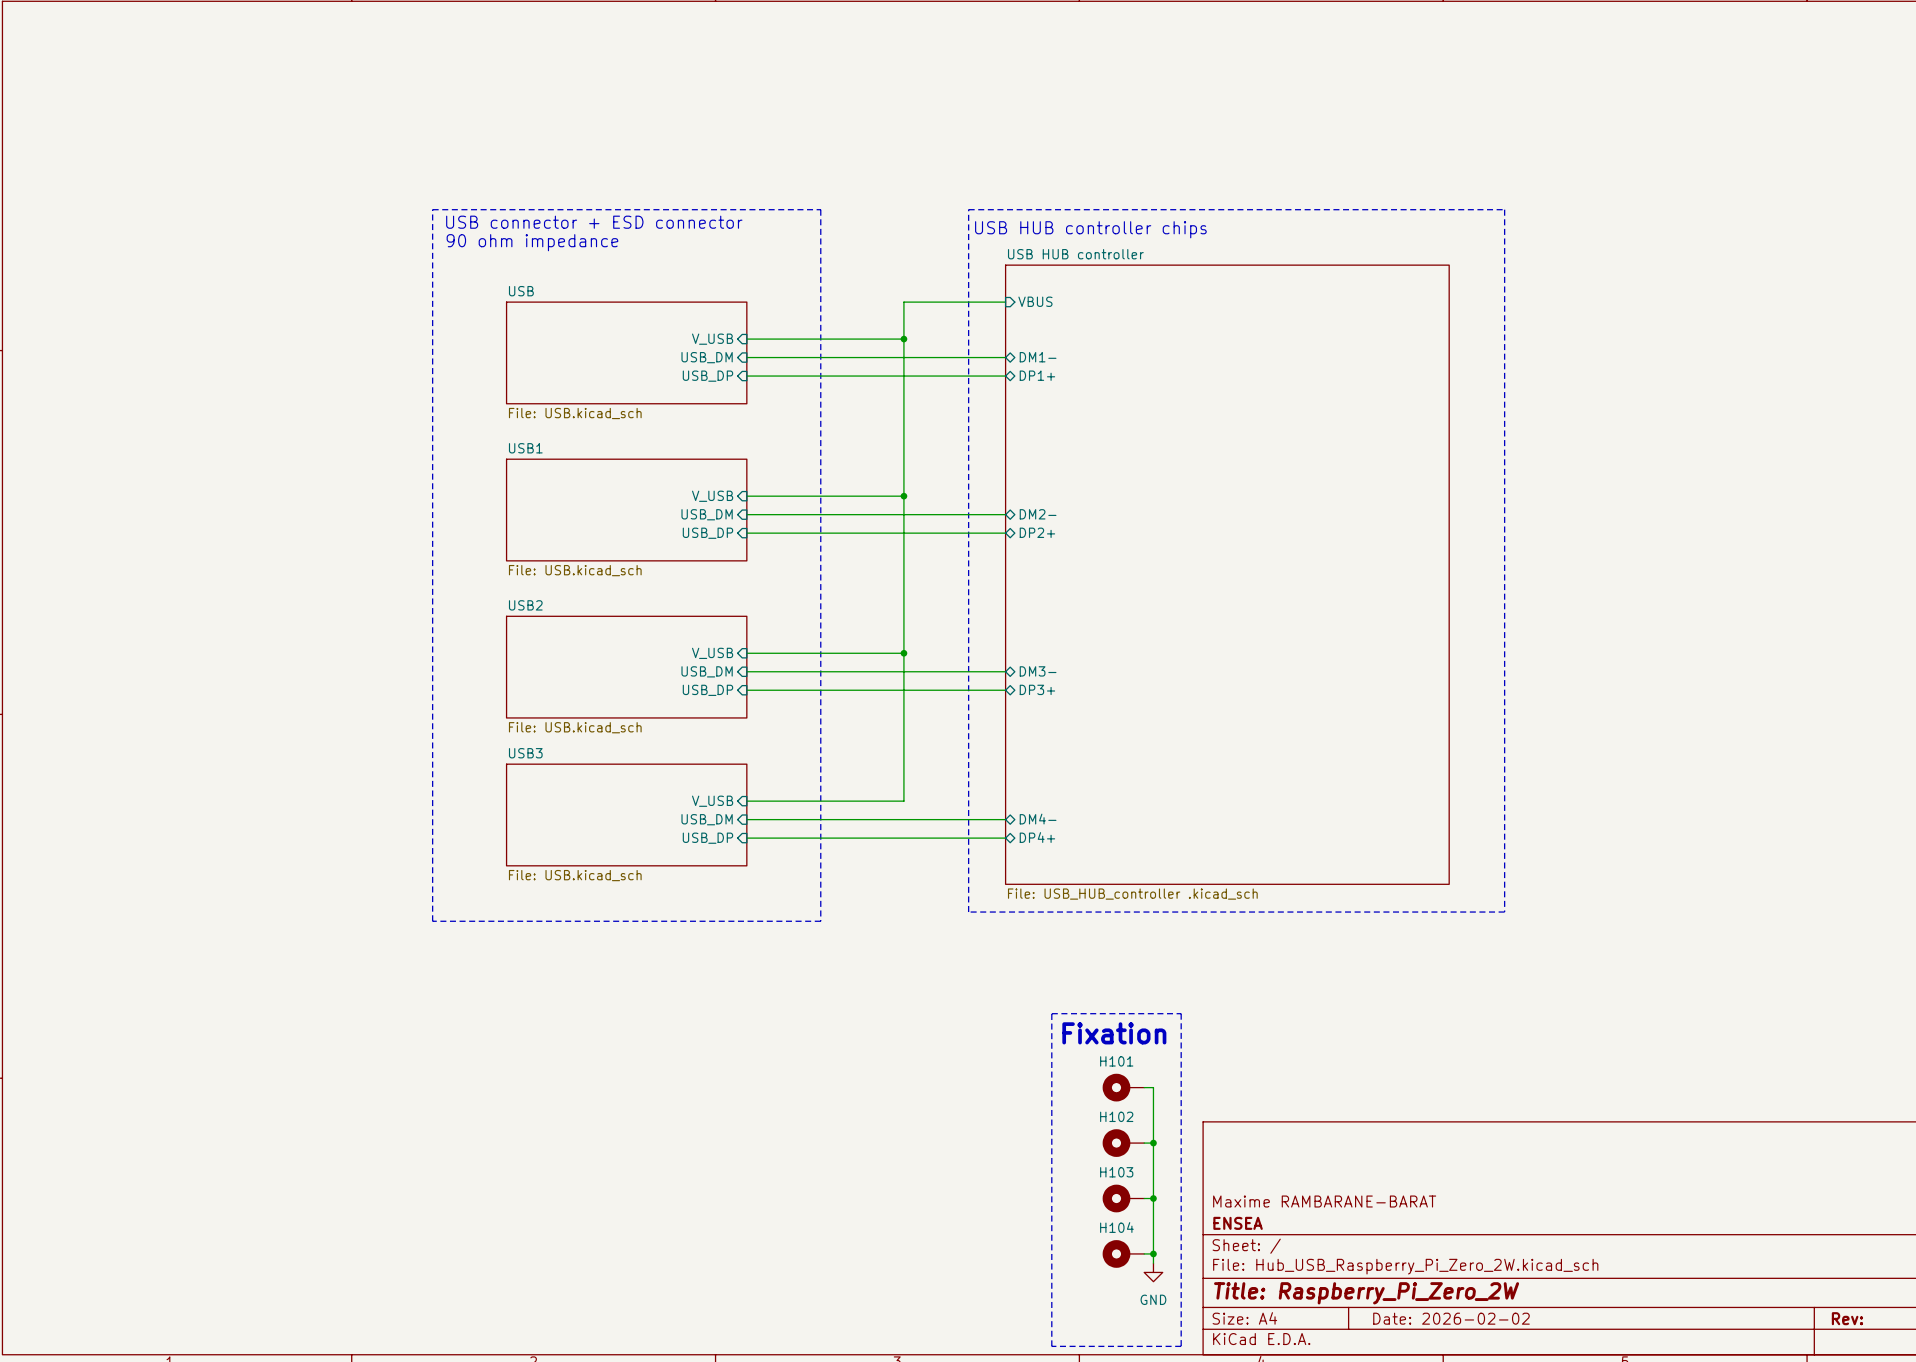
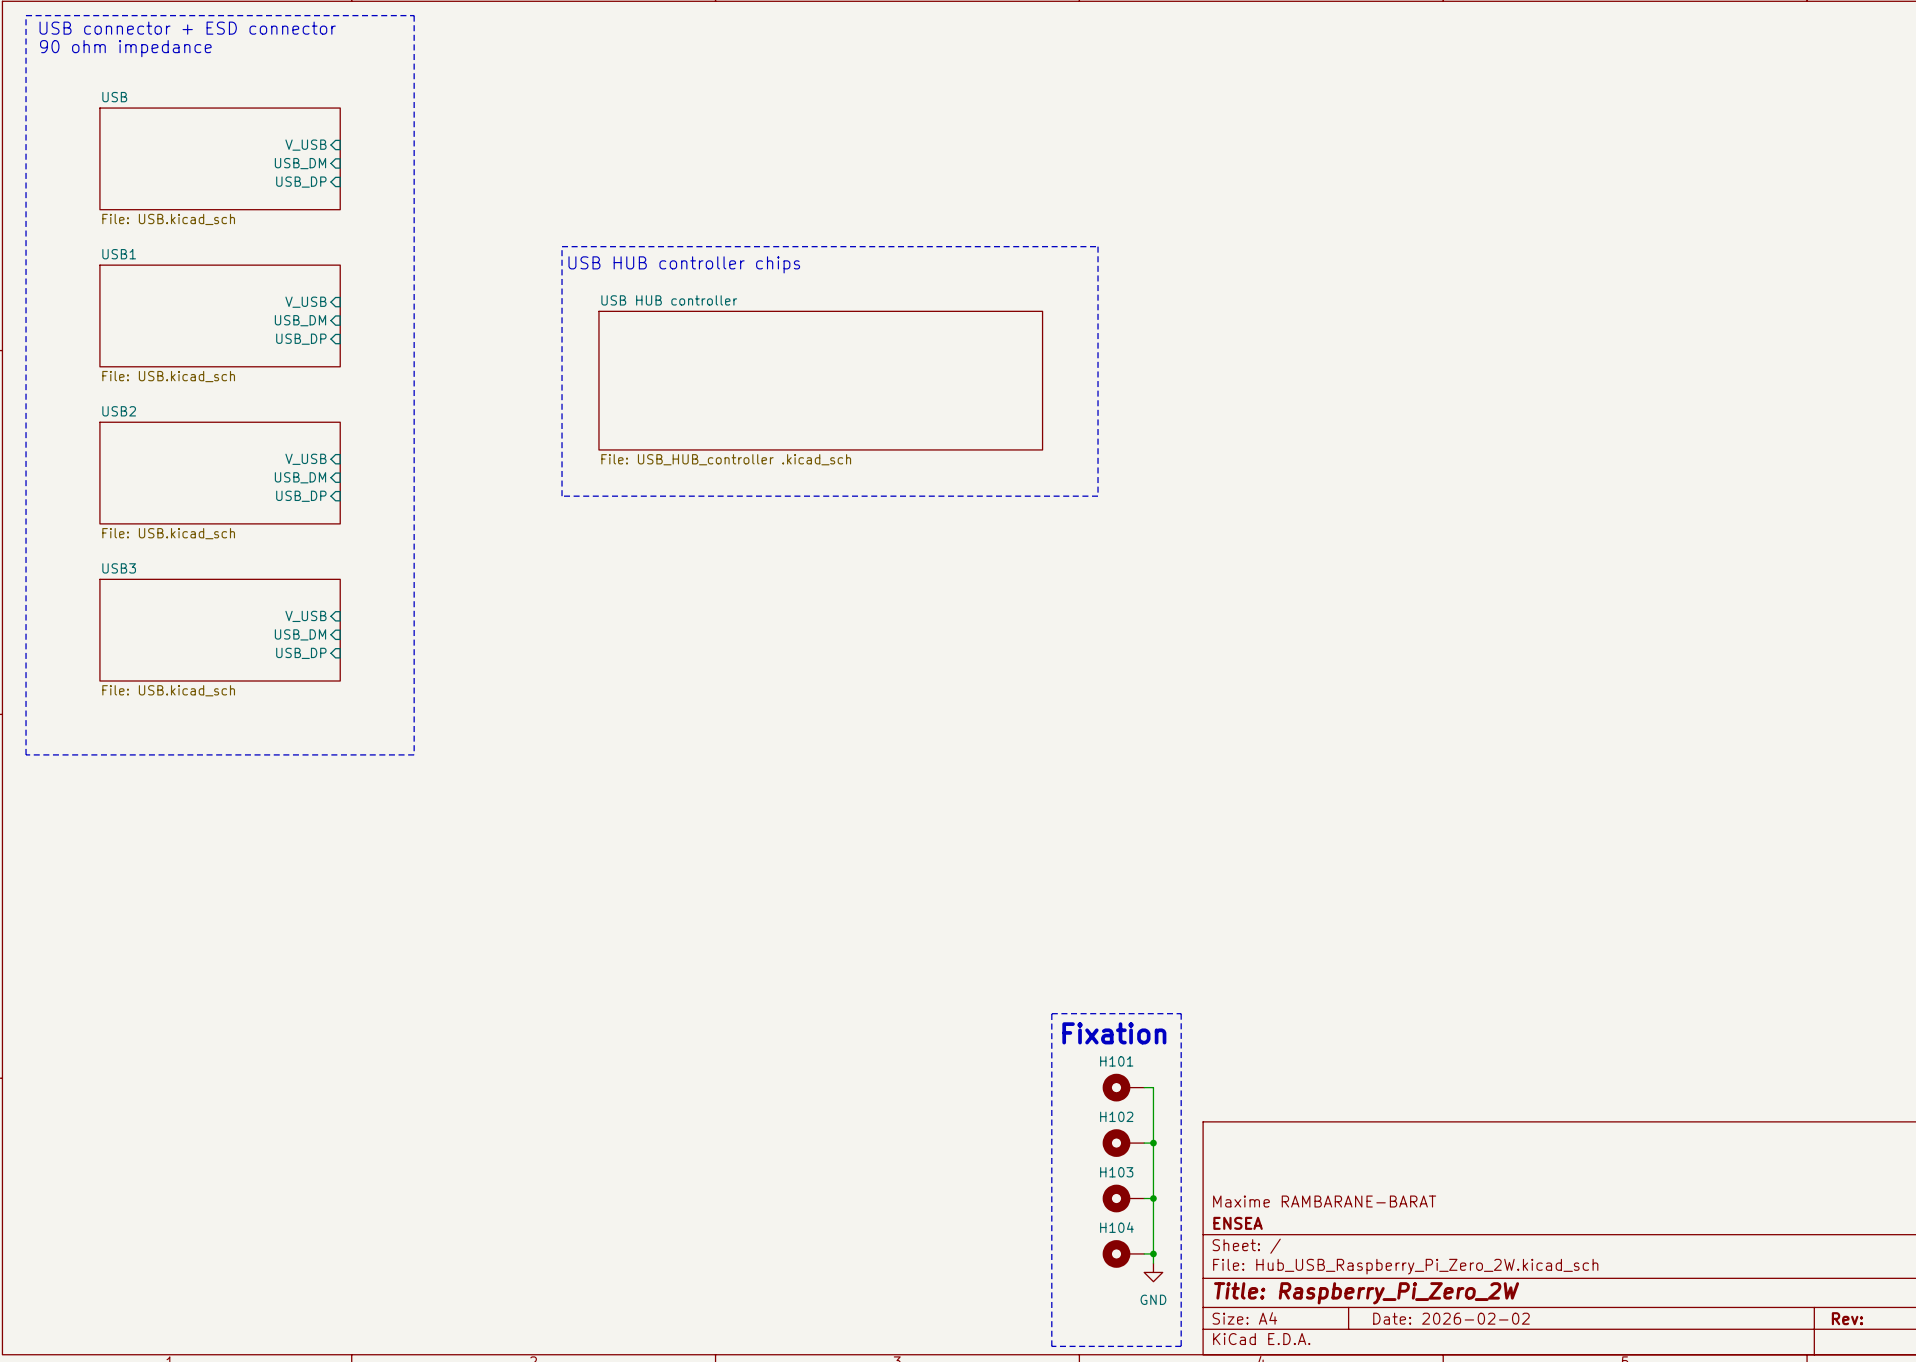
line: none -> (26, 15) (414, 15) (414, 754) (26, 754) (26, 15)
text: none -> USB connector + ESD connector (187, 28)
text: none -> 90 ohm impedance (125, 48)
sheet pin: none -> V_USB (305, 145)
sheet USB: none -> File: USB.kicad_sch (220, 158)
sheet pin: none -> USB_DM (300, 163)
sheet pin: none -> USB_DP (301, 182)
line: (432, 209) (820, 209) (820, 921) (432, 921) (432, 209) -> none
line: (968, 209) (1504, 209) (1504, 912) (968, 912) (968, 209) -> none
text: USB connector + ESD connector (594, 222) -> none
text: USB HUB controller chips (1090, 229) -> none
text: 90 ohm impedance (532, 242) -> none
line: none -> (562, 246) (1098, 246) (1098, 496) (562, 496) (562, 246)
text: none -> USB HUB controller chips (684, 264)
sheet pin: VBUS (1035, 301) -> none
sheet pin: none -> V_USB (305, 302)
wire: (1005, 302) (903, 302) (903, 801) (746, 801) -> none
sheet pin: none -> USB_DM (300, 320)
sheet pin: none -> USB_DP (301, 339)
sheet pin: V_USB (712, 339) -> none
wire: (746, 339) (903, 339) -> none
junction: (903, 339) -> none
sheet USB: File: USB.kicad_sch (626, 352) -> none
sheet pin: USB_DM (707, 357) -> none
wire: (746, 357) (1005, 357) -> none
sheet pin: DM1- (1038, 357) -> none
sheet pin: DP1+ (1037, 375) -> none
sheet pin: USB_DP (707, 376) -> none
wire: (746, 376) (1005, 376) -> none
sheet USB HUB controller: none -> File: USB_HUB_controller .kicad_sch (820, 380)
sheet pin: none -> V_USB (305, 459)
sheet pin: none -> USB_DM (300, 477)
sheet pin: none -> USB_DP (301, 496)
sheet pin: V_USB (712, 496) -> none
junction: (903, 496) -> none
sheet USB1 position: (626, 510) -> (220, 315)
sheet pin: USB_DM (707, 514) -> none
wire: (746, 514) (1005, 514) -> none
sheet pin: DM2- (1038, 514) -> none
sheet pin: DP2+ (1037, 532) -> none
sheet pin: USB_DP (707, 533) -> none
wire: (746, 533) (1005, 533) -> none
sheet USB HUB controller: File: USB_HUB_controller .kicad_sch (1227, 574) -> none
sheet pin: none -> V_USB (305, 616)
sheet pin: none -> USB_DM (300, 634)
sheet pin: none -> USB_DP (301, 653)
sheet pin: V_USB (712, 653) -> none
wire: (746, 653) (903, 653) -> none
junction: (903, 653) -> none
sheet USB2 position: (626, 667) -> (220, 473)
sheet pin: USB_DM (707, 671) -> none
wire: (746, 671) (1005, 671) -> none
sheet pin: DM3- (1038, 671) -> none
sheet pin: DP3+ (1037, 689) -> none
sheet pin: USB_DP (707, 690) -> none
wire: (746, 690) (1005, 690) -> none
sheet pin: V_USB (712, 801) -> none
sheet USB3 position: (626, 814) -> (220, 630)
sheet pin: USB_DM (707, 819) -> none
wire: (746, 819) (1005, 819) -> none
sheet pin: DM4- (1038, 819) -> none
sheet pin: DP4+ (1037, 837) -> none
sheet pin: USB_DP (707, 838) -> none
wire: (746, 838) (1005, 838) -> none

